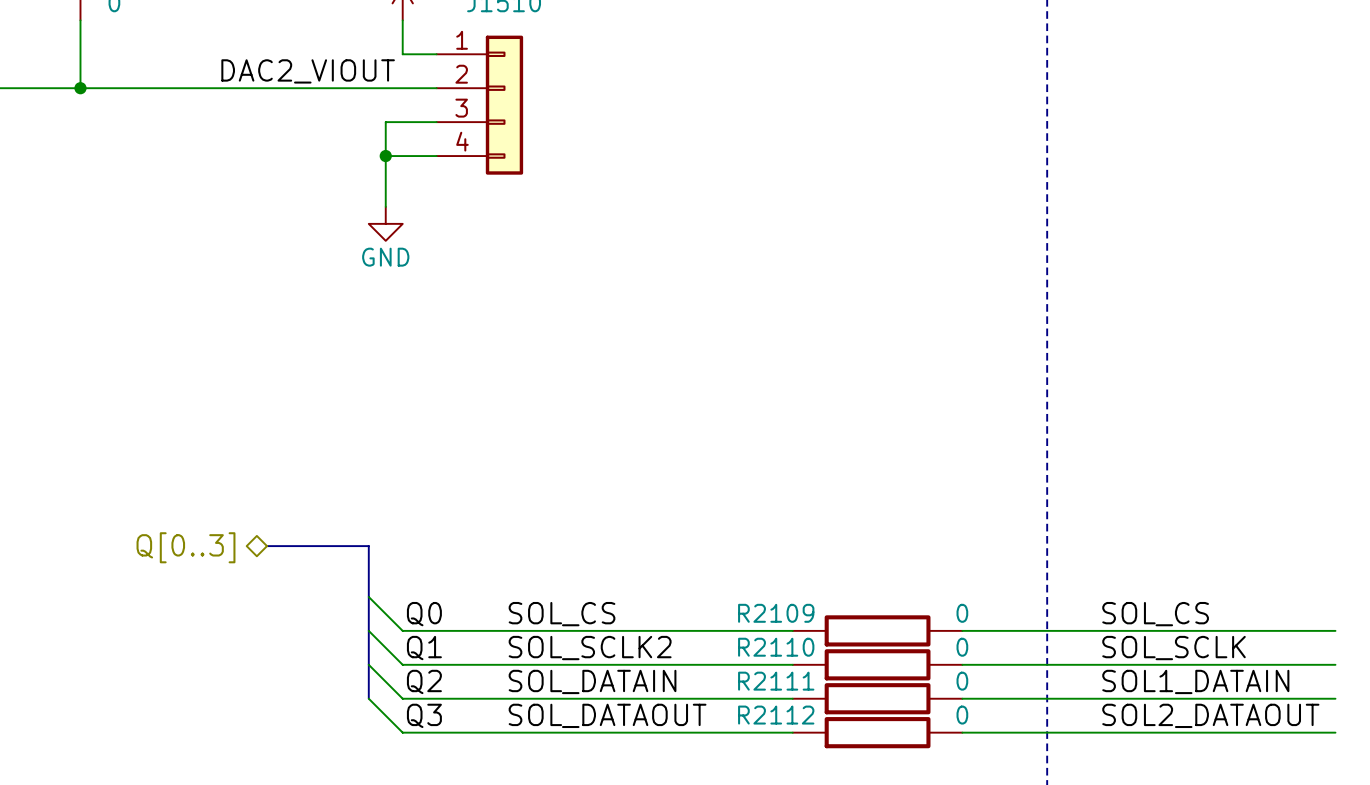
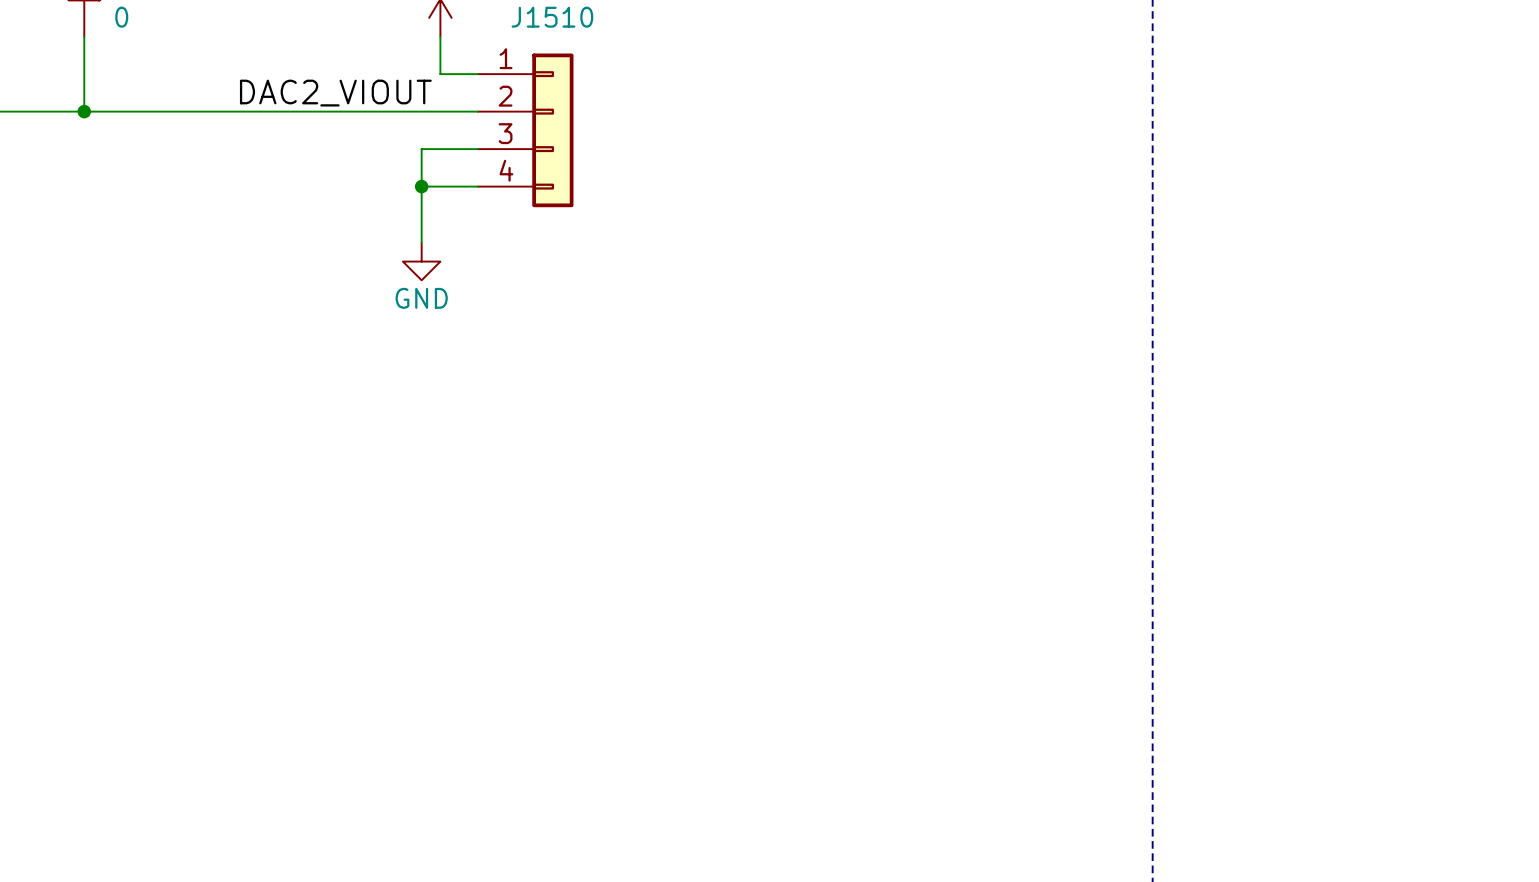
bus: (267, 546) (368, 546) (368, 698) -> none
hierarchical label: Q[0..3] (185, 547) -> none
wire: (368, 596) (402, 630) (792, 630) -> none
label: Q0 (424, 614) -> none
label: SOL_CS (562, 614) -> none
label: SOL_CS (1155, 614) -> none
wire: (368, 630) (402, 664) (792, 664) -> none
R2109: 0 (877, 630) -> none
wire: (962, 630) (1335, 630) -> none
label: Q1 (424, 648) -> none
label: SOL_SCLK2 (590, 648) -> none
label: SOL_SCLK (1174, 648) -> none
wire: (368, 664) (402, 698) (792, 698) -> none
R2110: 0 (877, 664) -> none
wire: (962, 664) (1335, 664) -> none
label: Q2 (424, 681) -> none
label: SOL_DATAIN (592, 681) -> none
label: SOL1_DATAIN (1195, 681) -> none
wire: (368, 698) (402, 732) (792, 732) -> none
R2111: 0 (877, 698) -> none
wire: (962, 698) (1335, 698) -> none
label: Q3 (424, 715) -> none
label: SOL_DATAOUT (607, 715) -> none
label: SOL2_DATAOUT (1210, 715) -> none
R2112: 0 (877, 732) -> none
wire: (962, 732) (1335, 732) -> none

